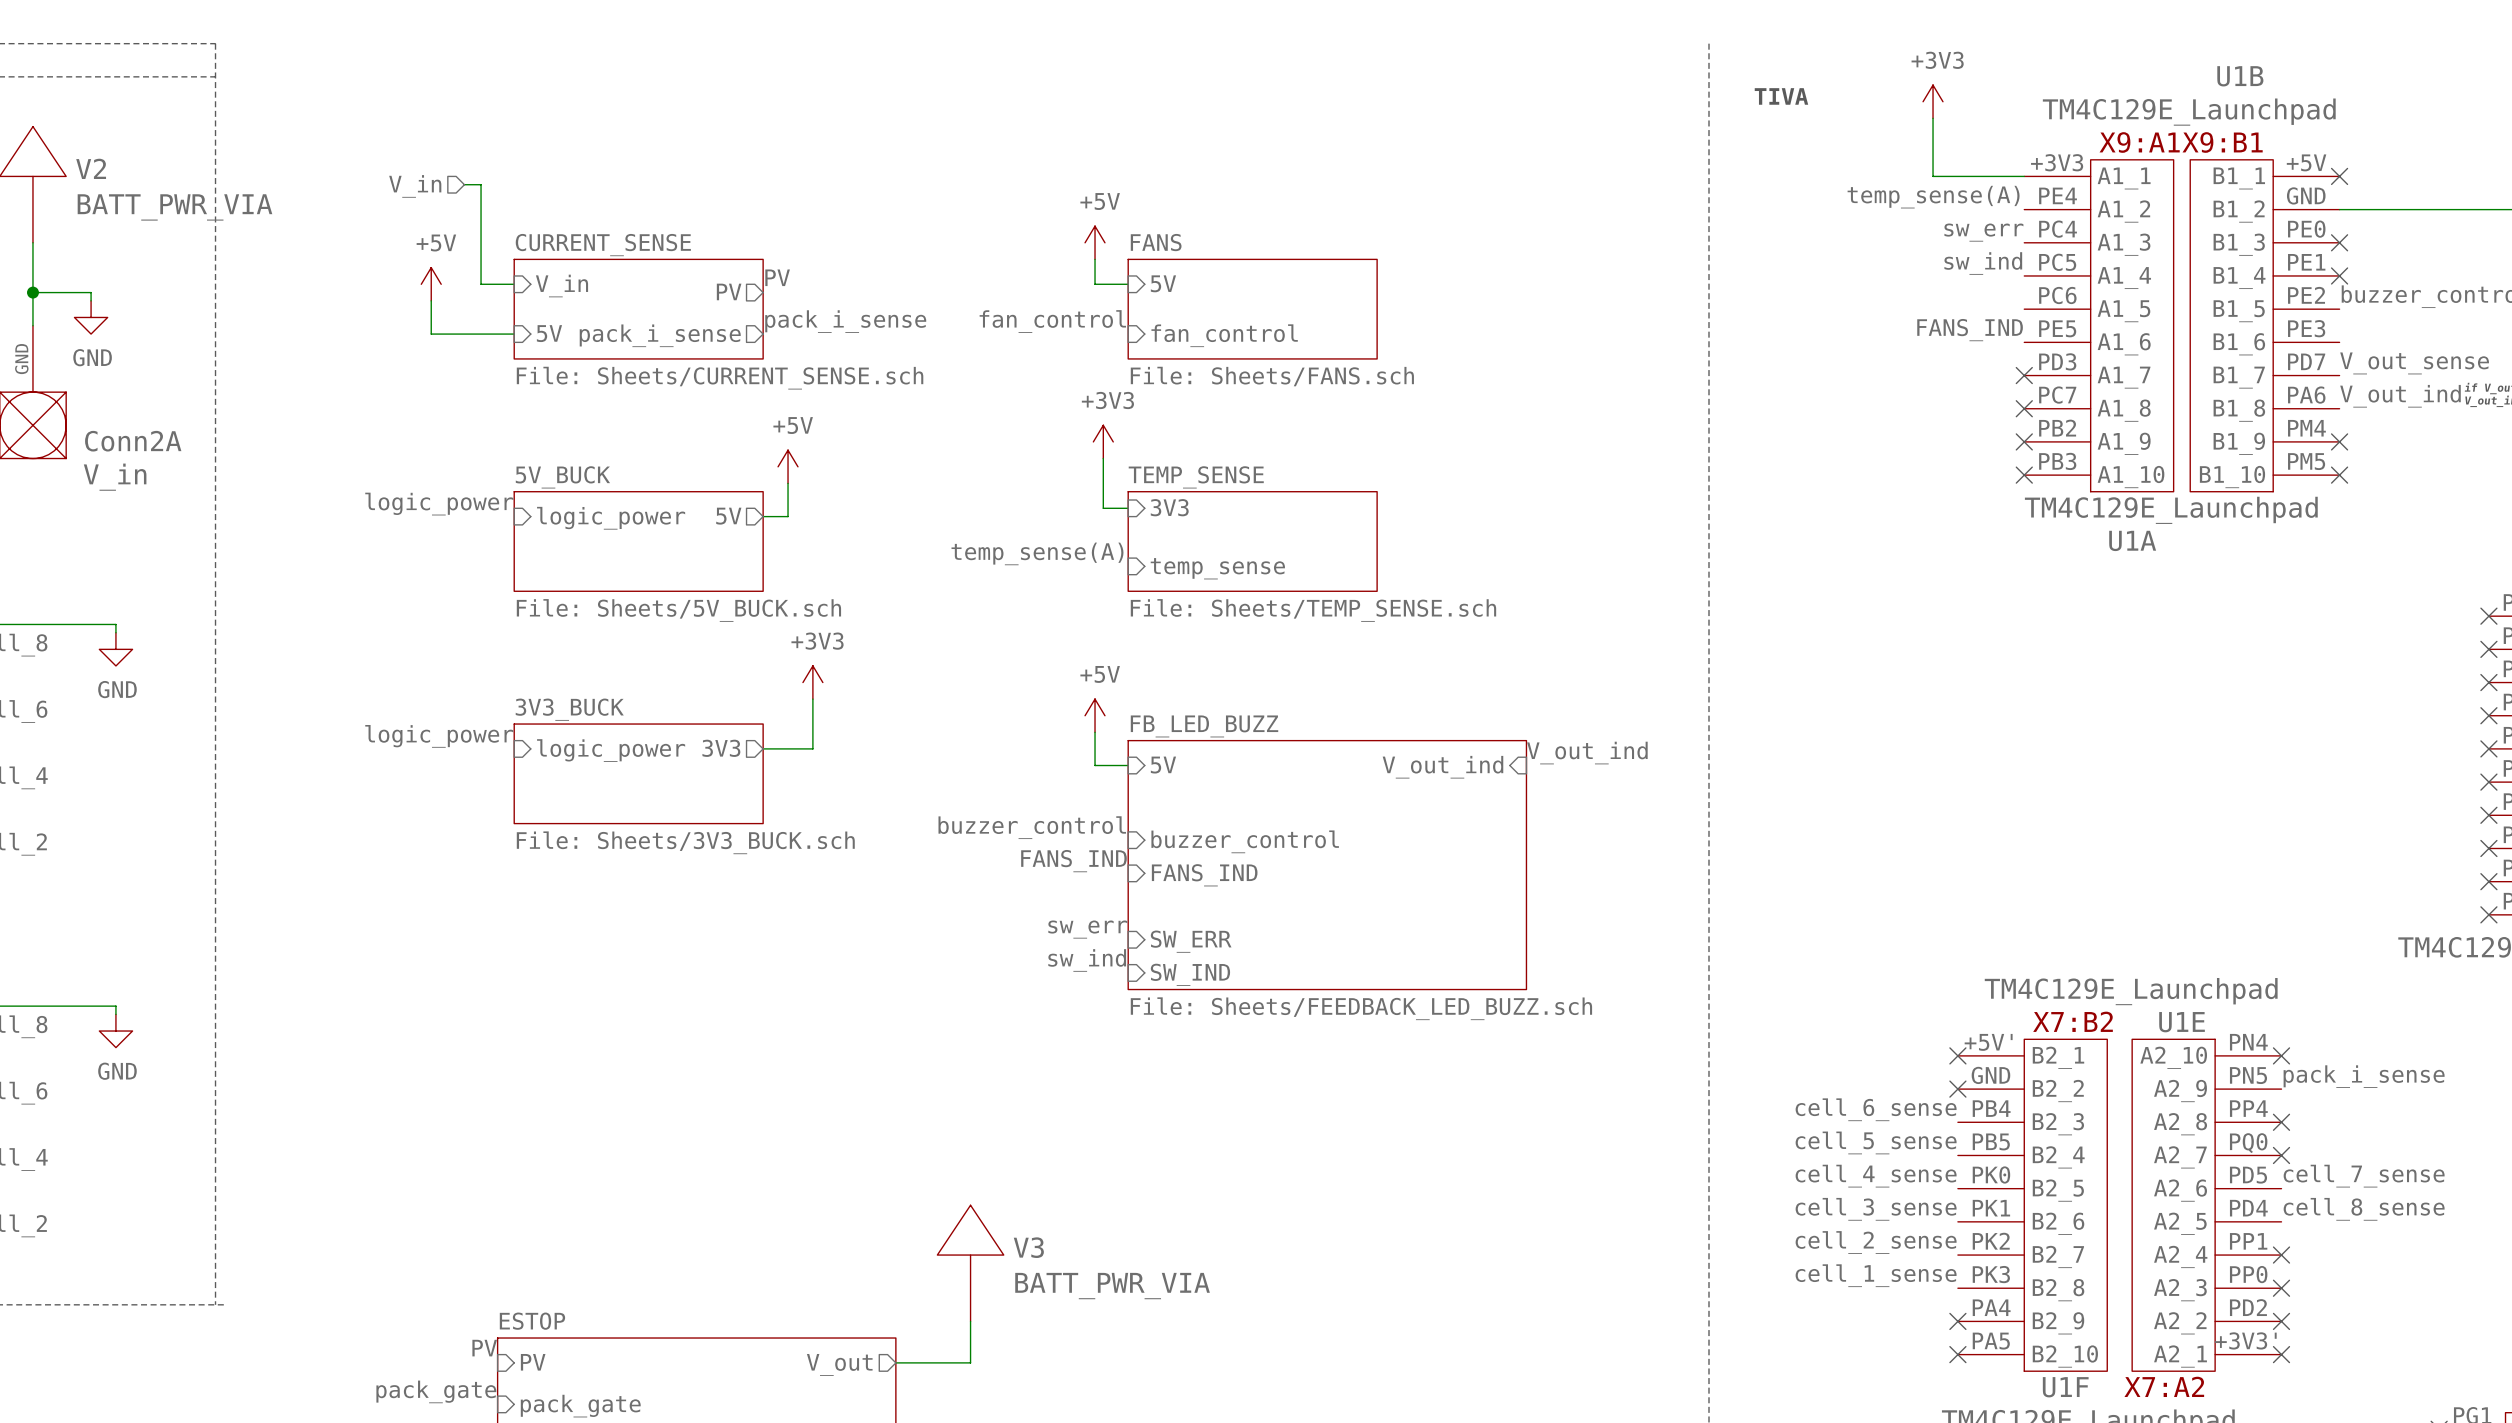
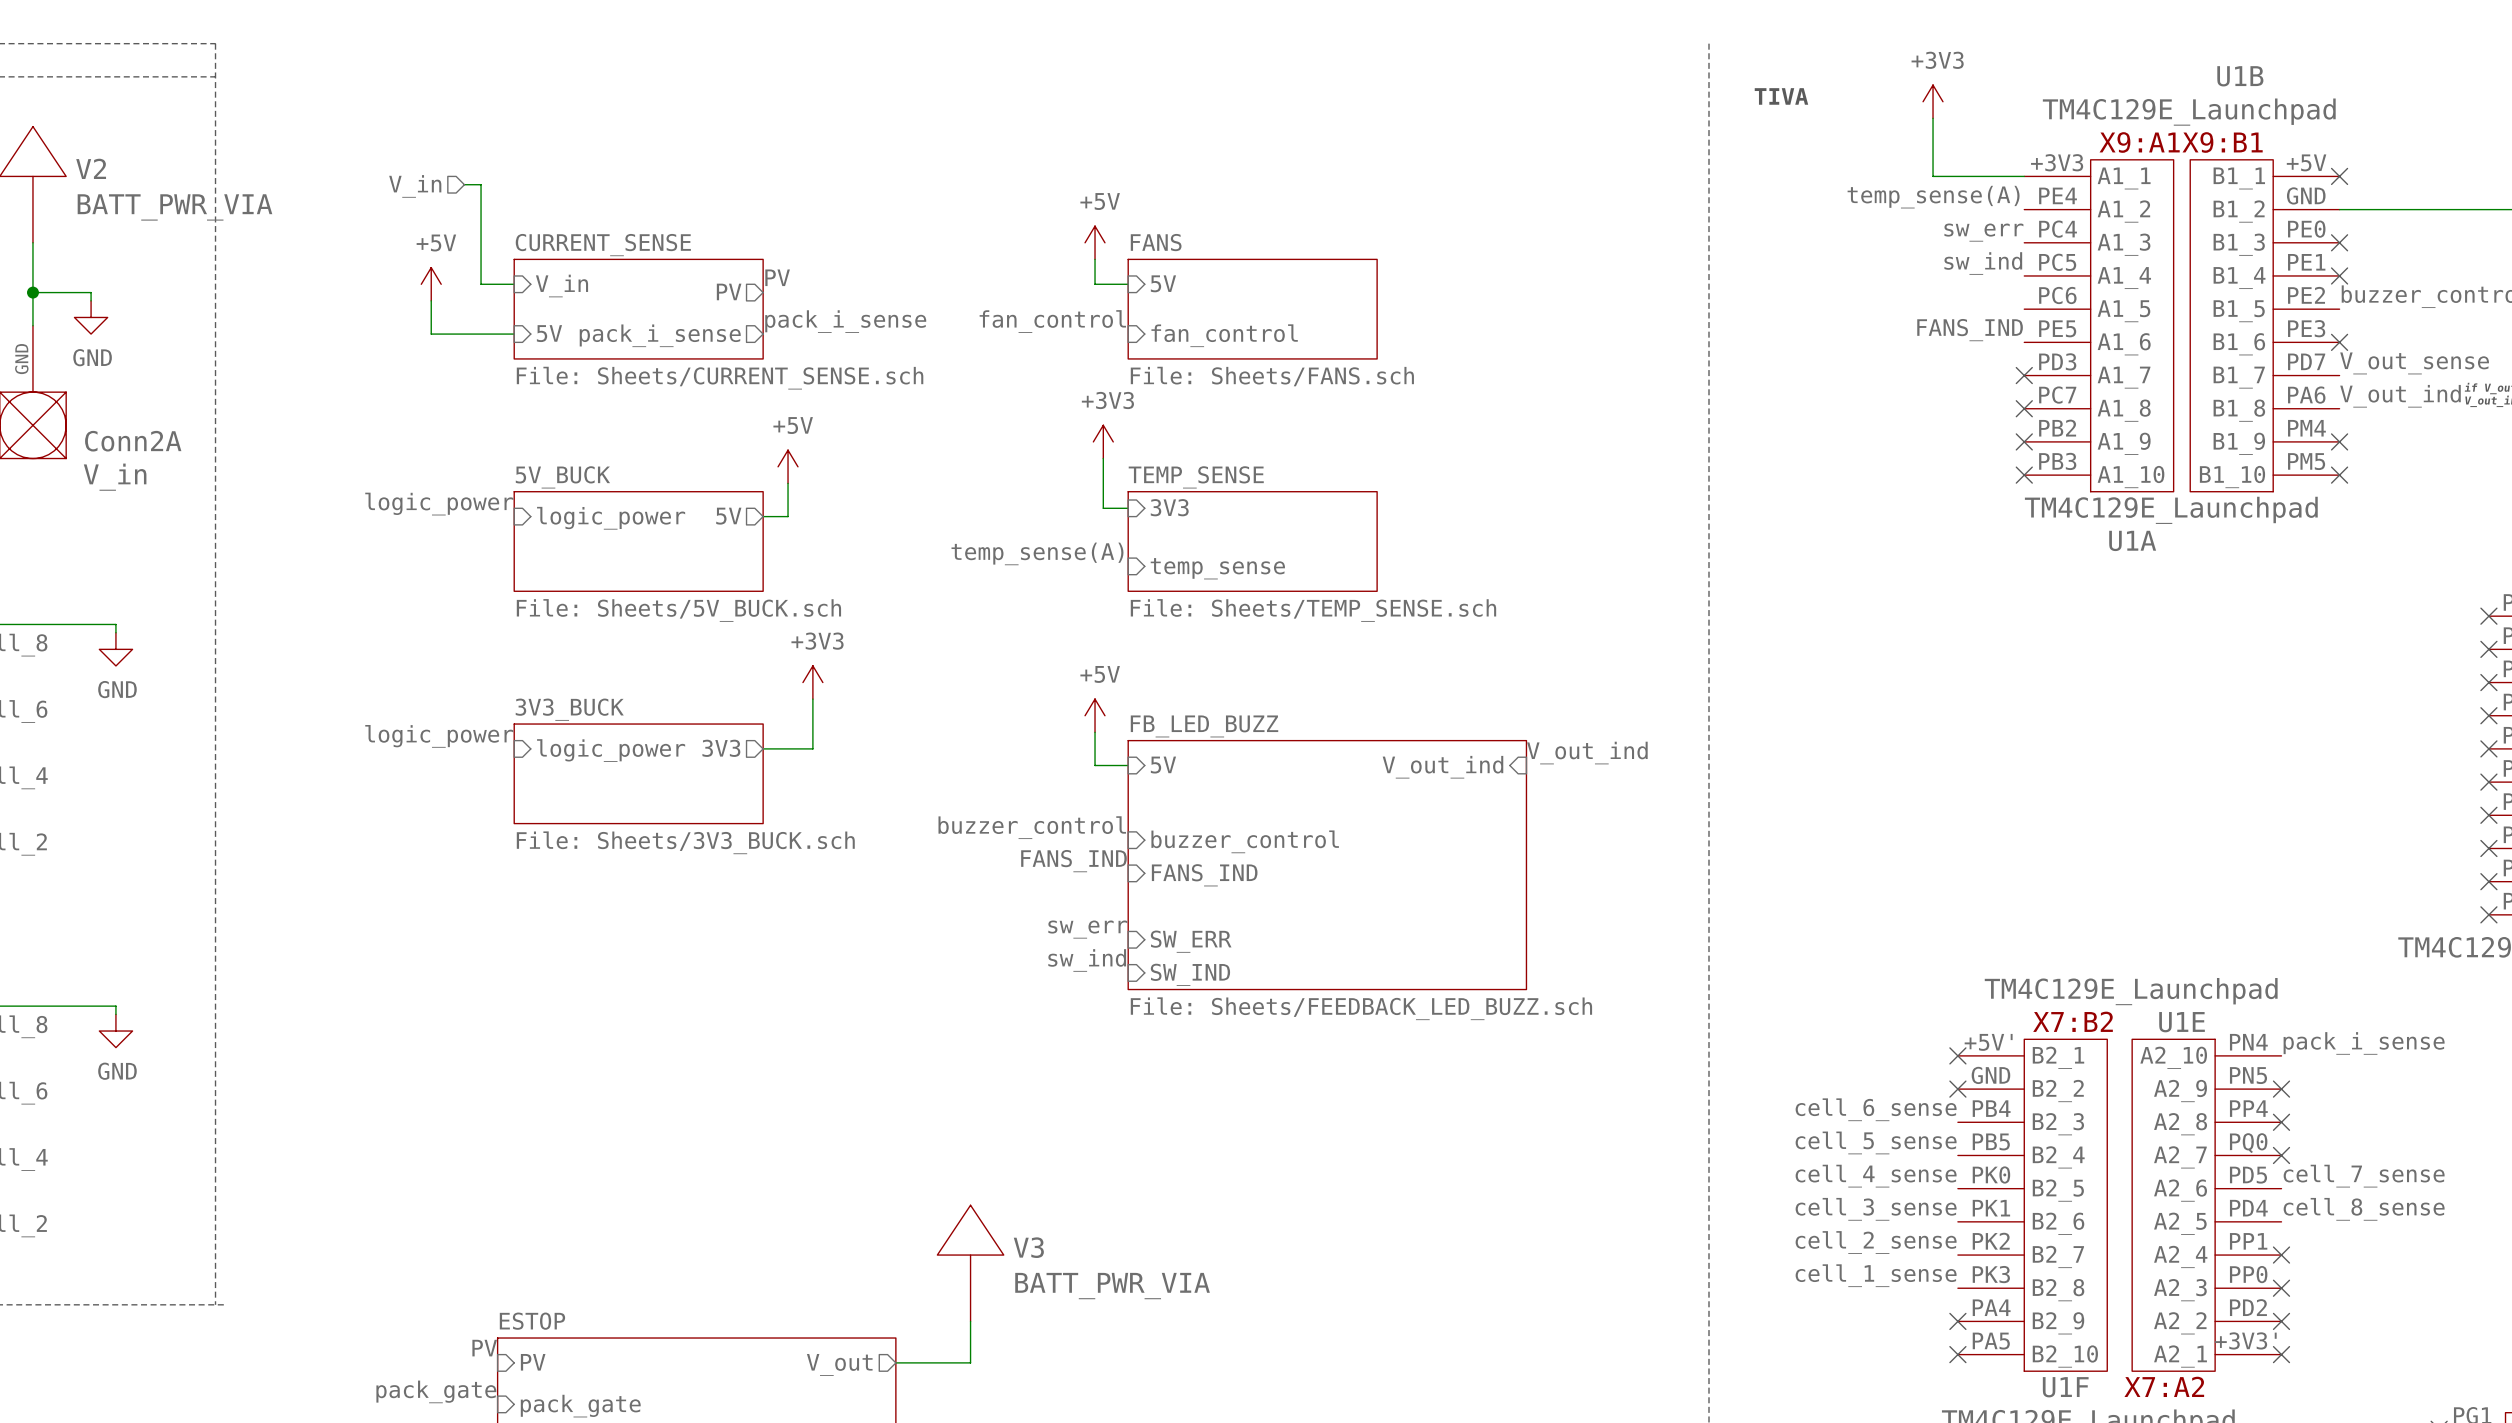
no-connect mark: none -> (2339, 342)
no-connect mark position: (2281, 1055) -> (2281, 1089)
label position: pack_i_sense (2364, 1076) -> pack_i_sense (2364, 1043)

